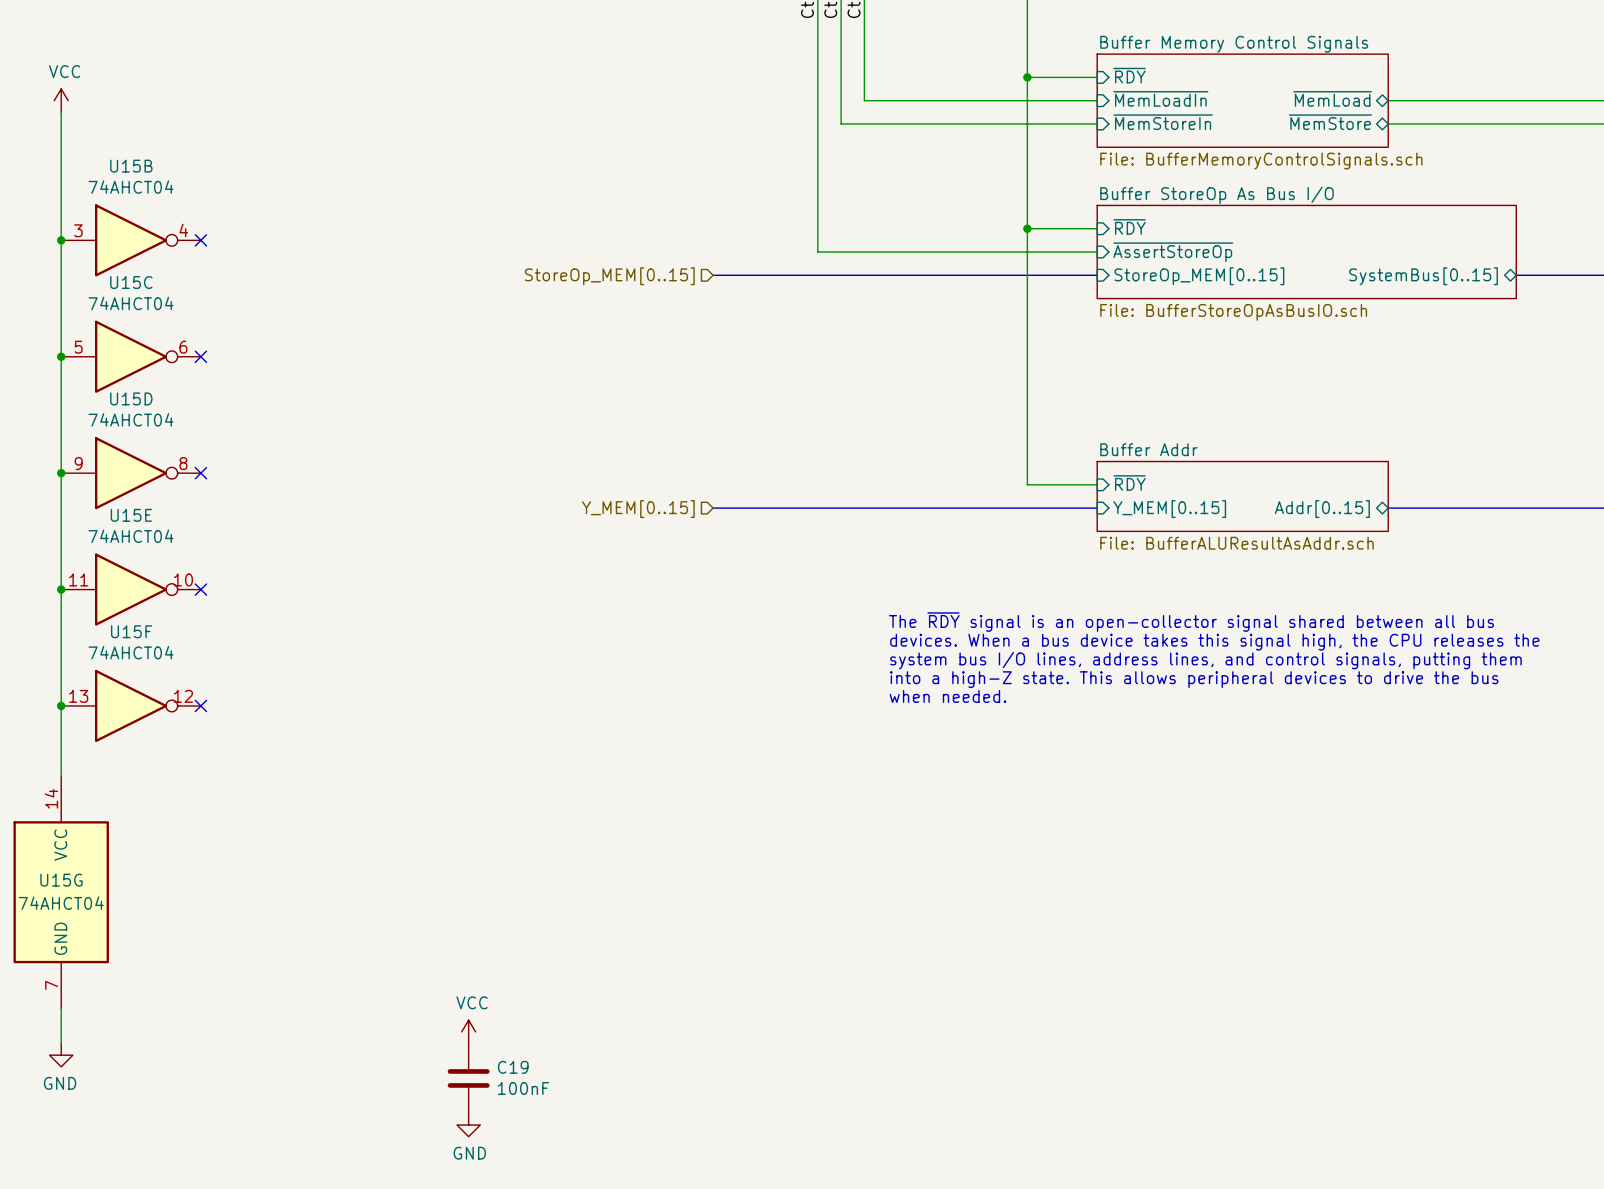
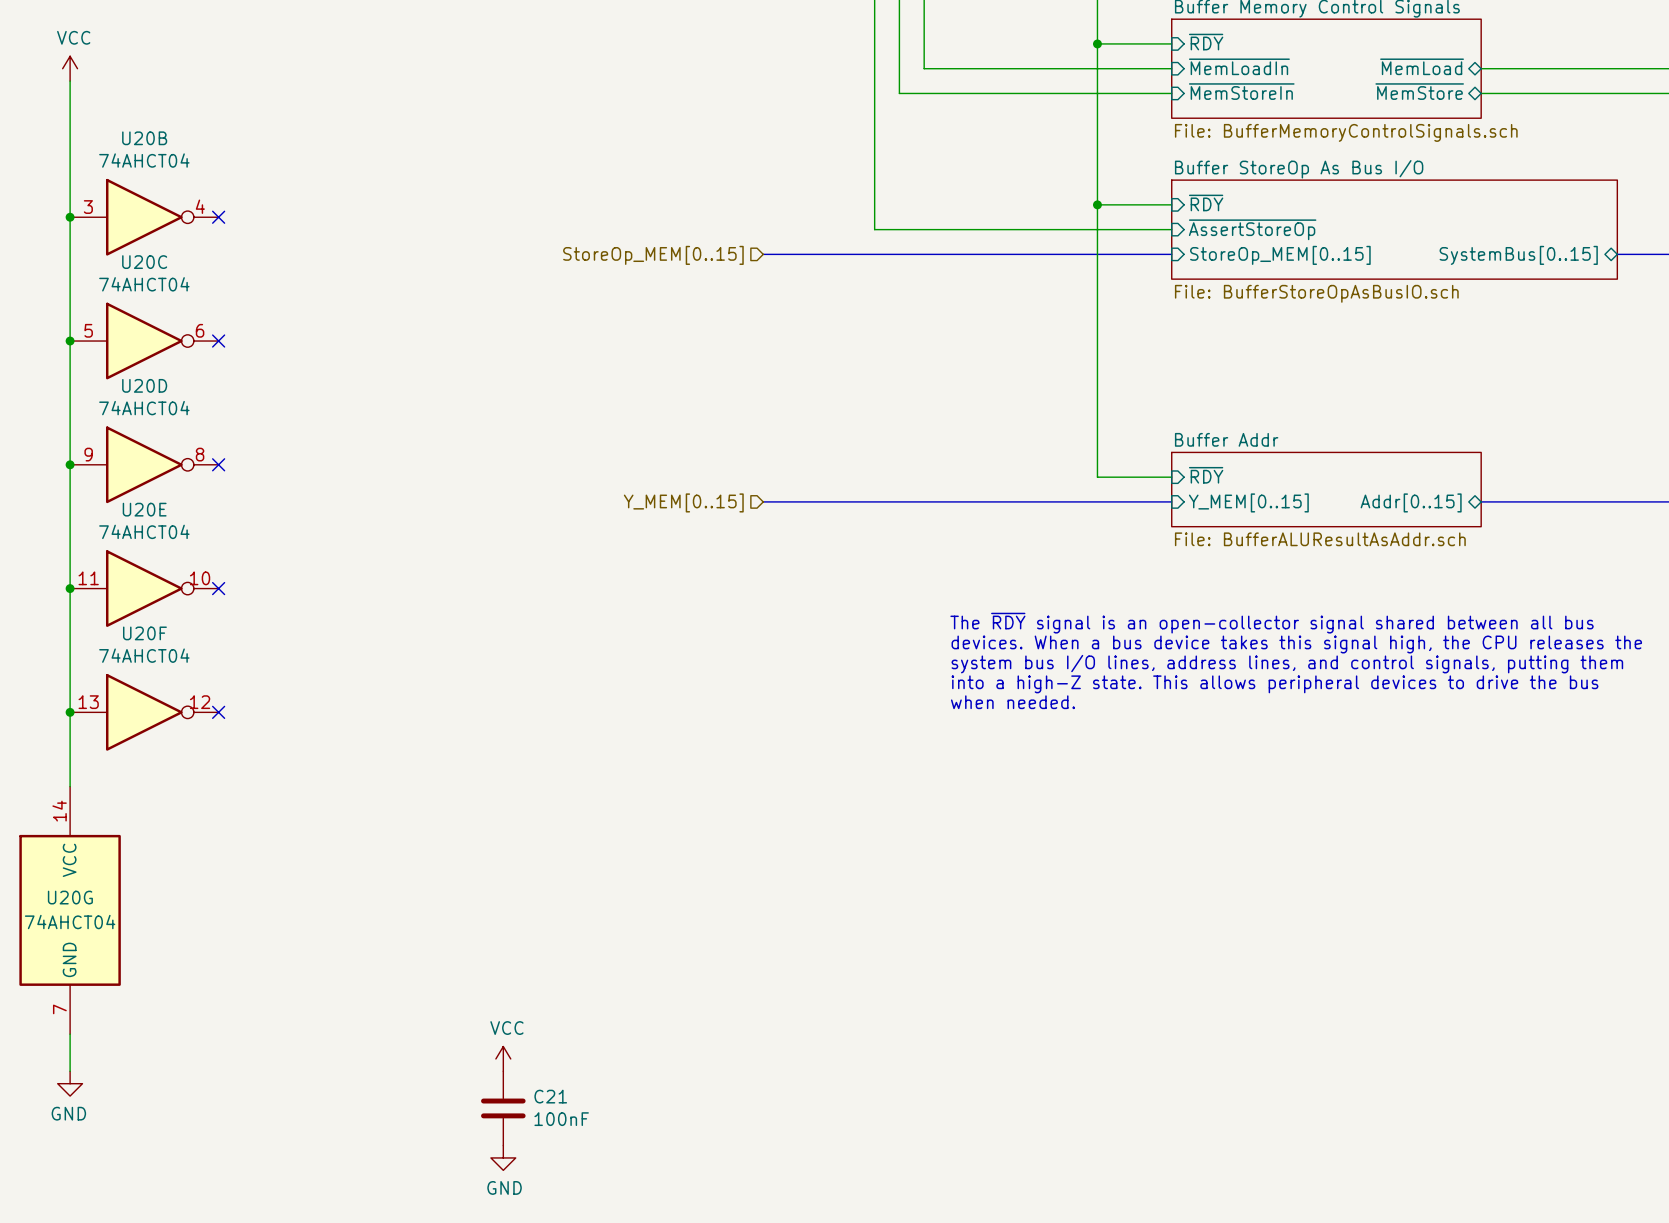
U15B name: U15B (131, 166) -> U20B (144, 138)
U15C name: U15C (131, 282) -> U20C (144, 262)
U15D name: U15D (131, 398) -> U20D (144, 385)
U15E name: U15E (131, 515) -> U20E (144, 509)
U15F name: U15F (131, 631) -> U20F (144, 633)
U15G name: U15G (61, 880) -> U20G (70, 897)
C19 name: C19 (513, 1067) -> C21 (550, 1096)

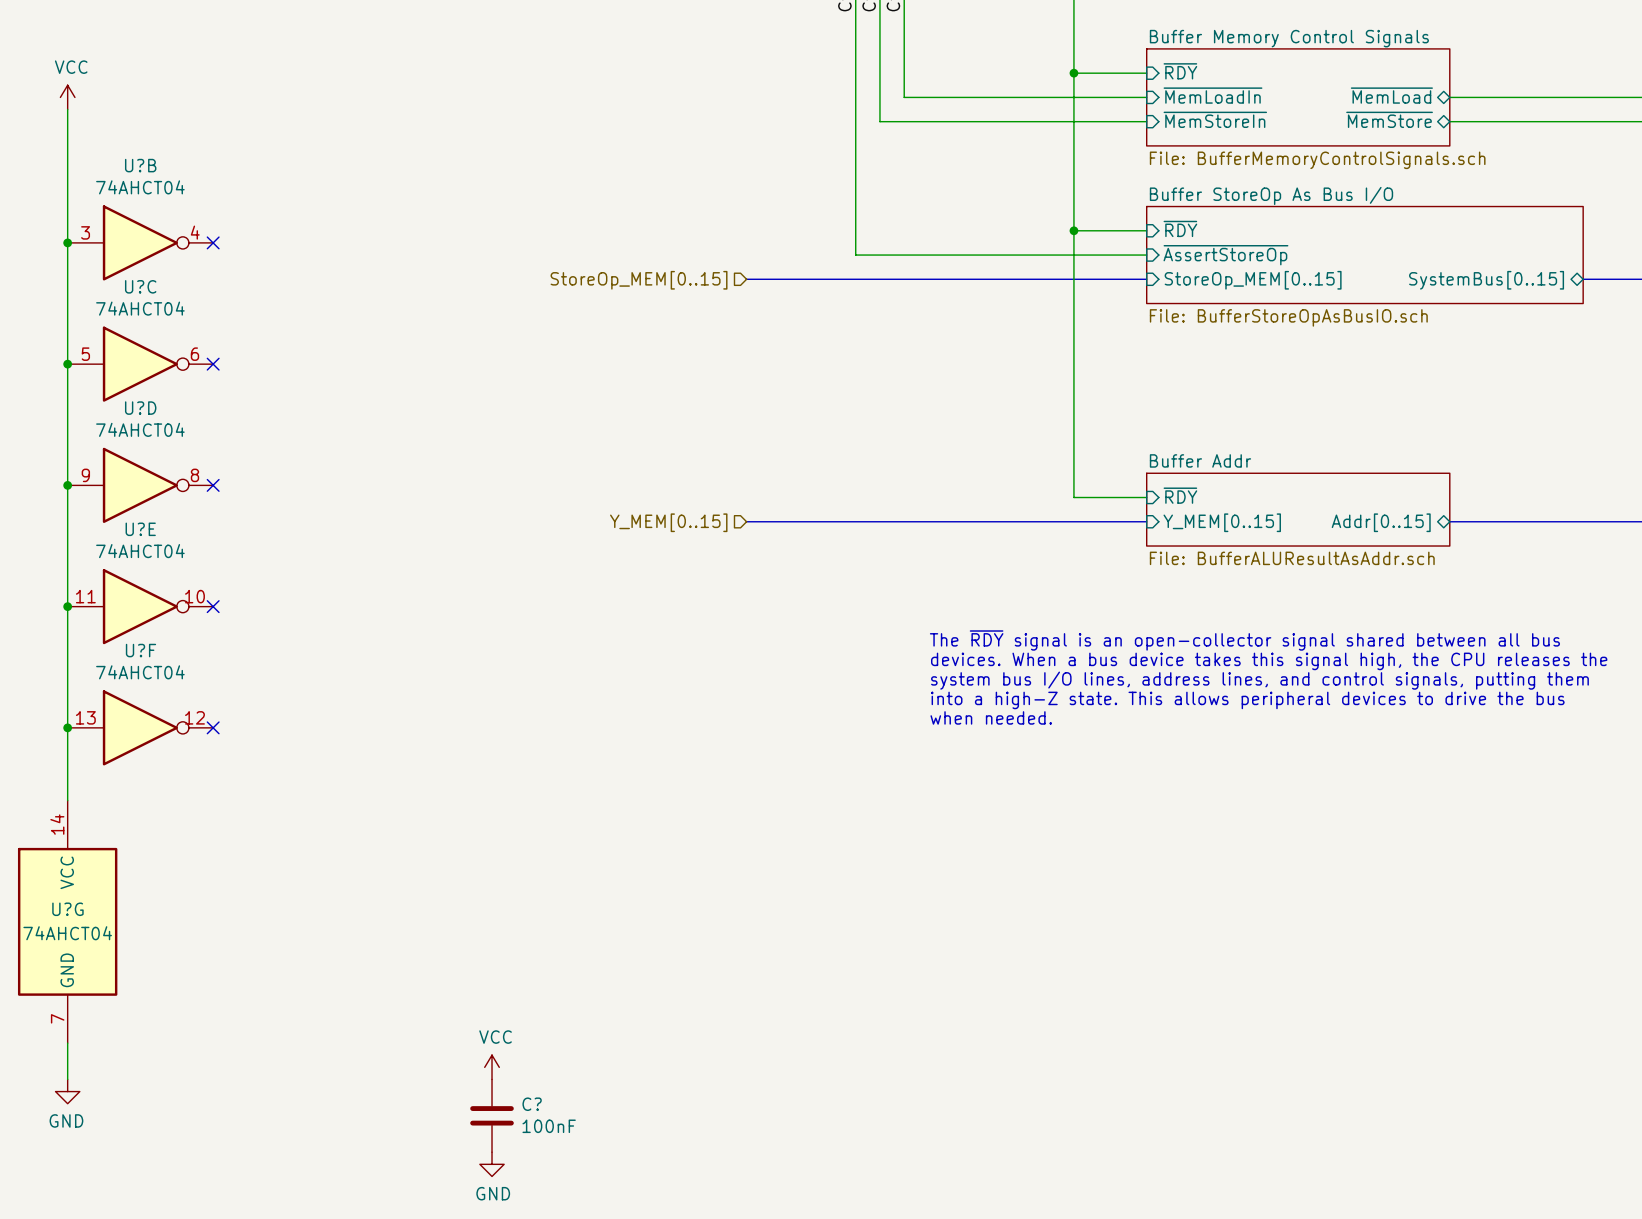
U20B name: U20B (144, 138) -> U?B (140, 165)
U20C name: U20C (144, 262) -> U?C (140, 286)
U20D name: U20D (144, 385) -> U?D (140, 408)
U20E name: U20E (144, 509) -> U?E (140, 529)
U20F name: U20F (144, 633) -> U?F (140, 650)
U20G name: U20G (70, 897) -> U?G (67, 909)
C21 name: C21 (550, 1096) -> C? (532, 1104)

